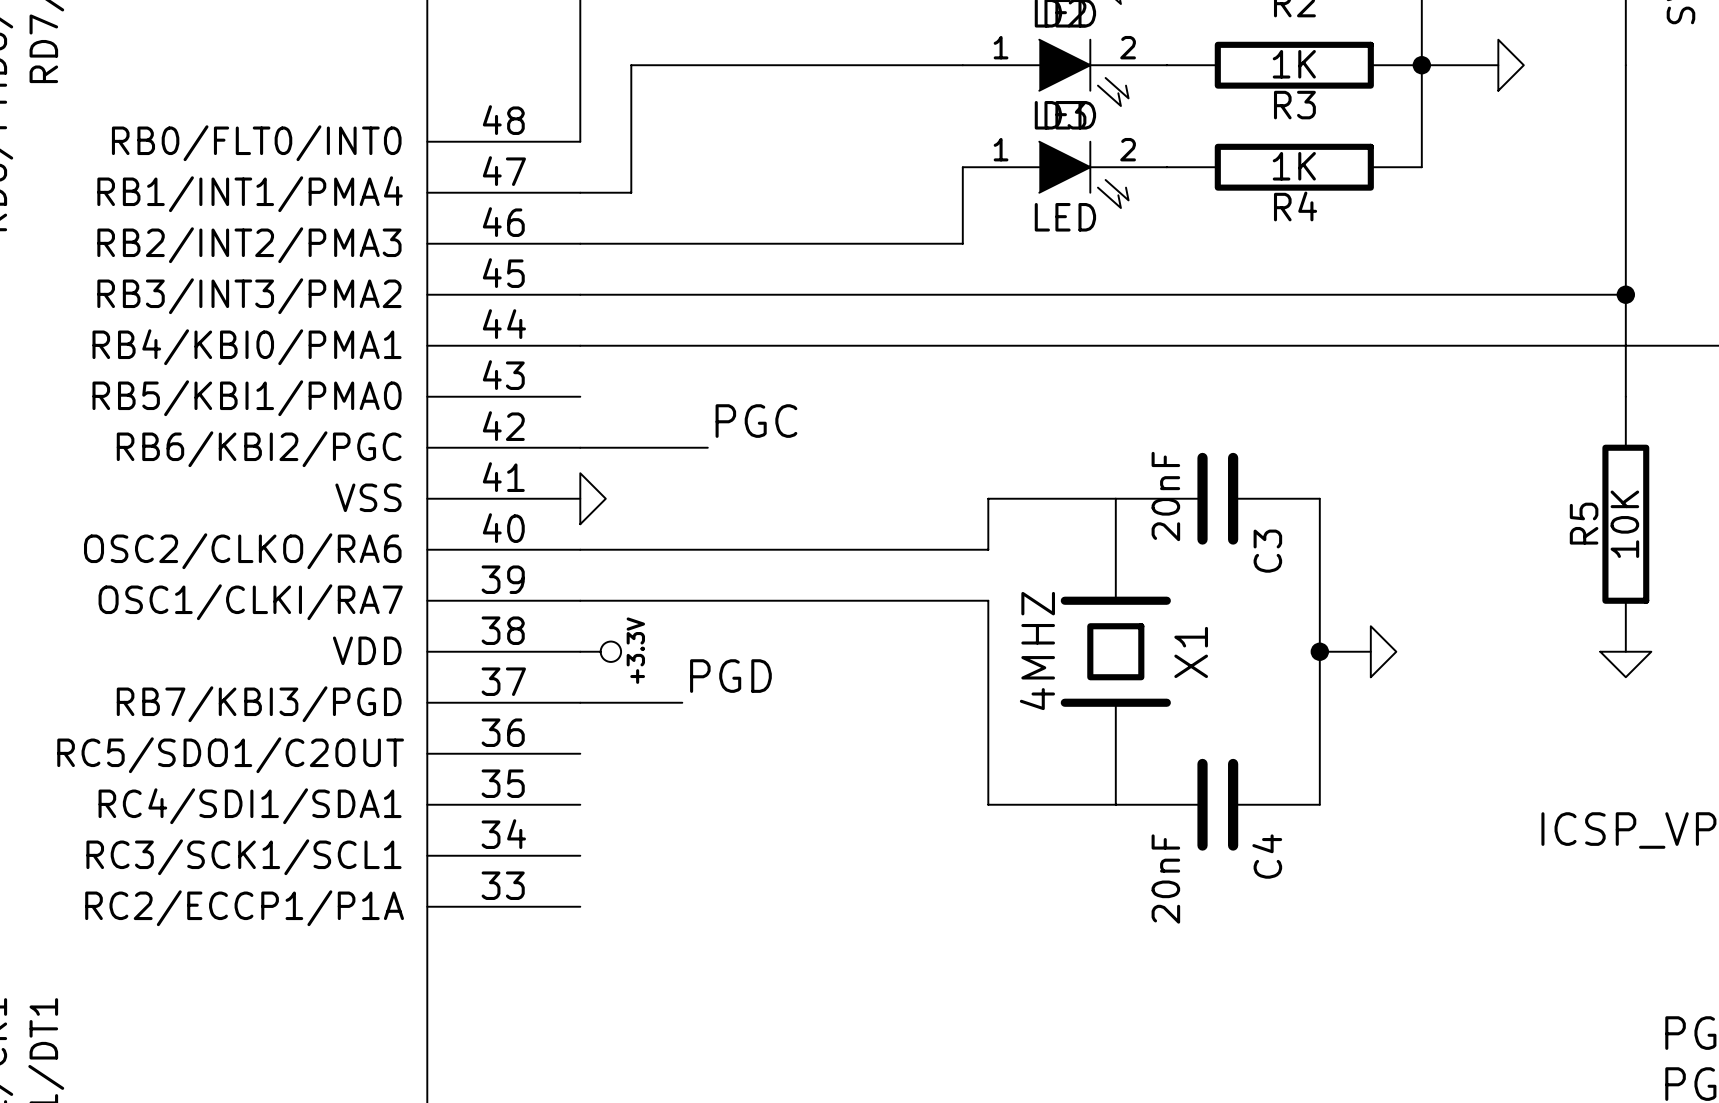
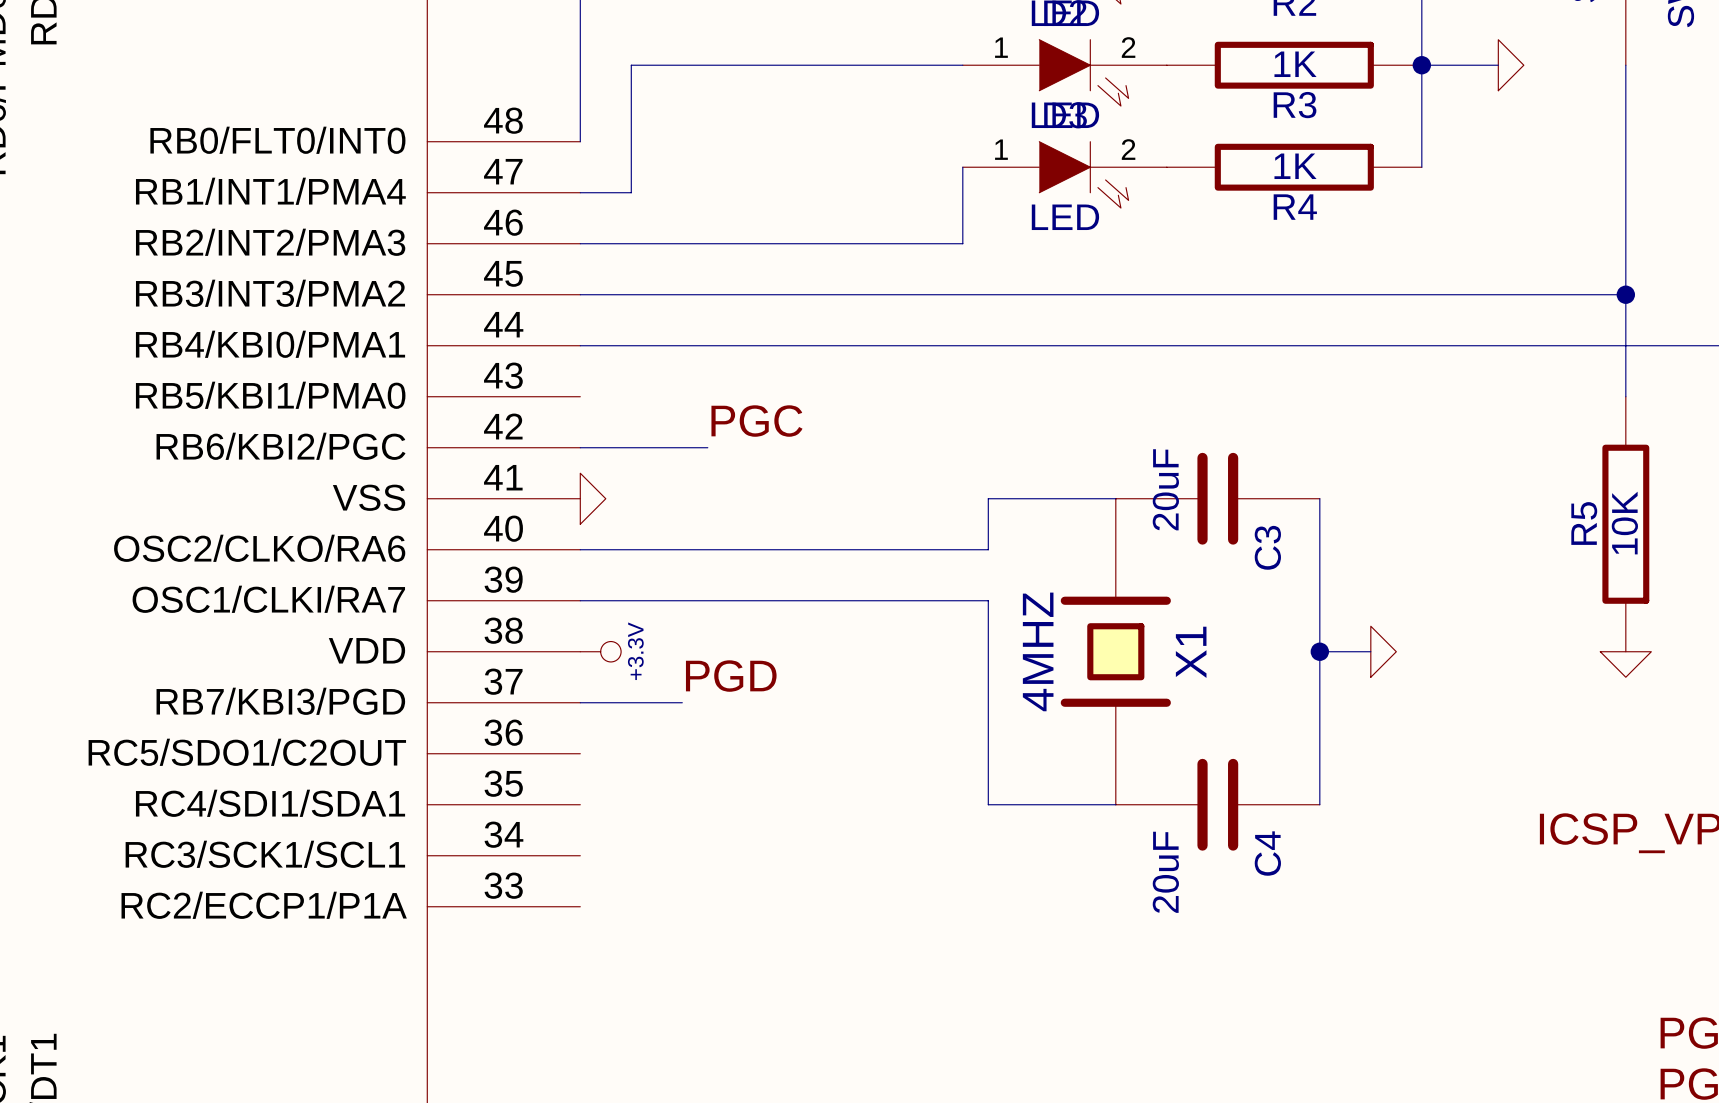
C3 value: 20nF (1165, 496) -> 20uF (1165, 489)
C4 value: 20nF (1165, 879) -> 20uF (1165, 872)

